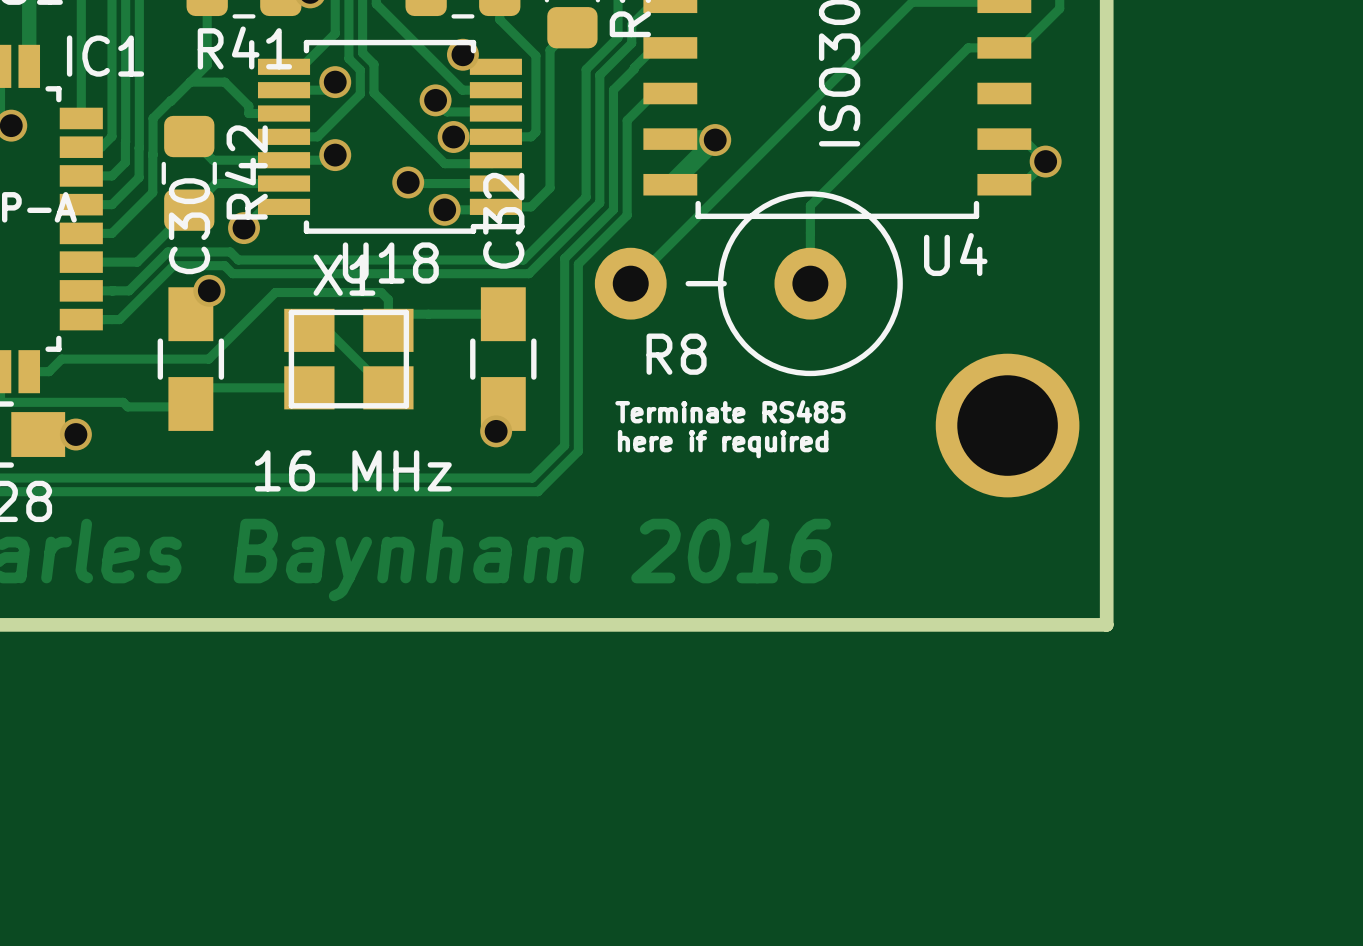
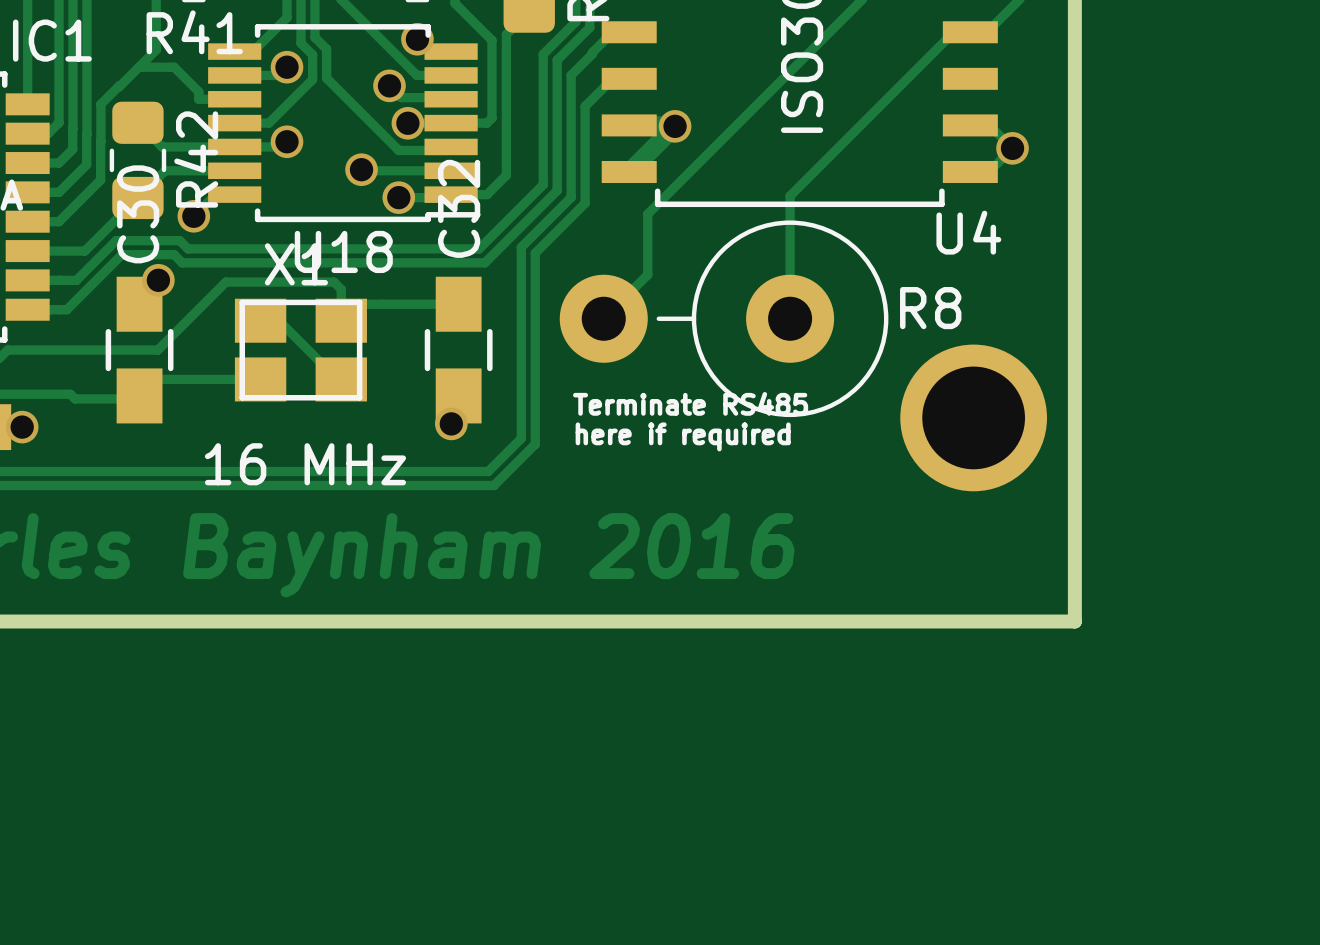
track: (988, 47) (968, 47) (810, 205) (810, 283) -> (953, 32) (790, 195) (790, 318)
R8 footprint: [594, 191, 903, 377] -> [559, 220, 889, 418]
track: (688, 225) (630, 283) -> (647, 214) (647, 274) (603, 318)
U4 name position: U4 (955, 254) -> U4 (968, 232)
R8 name position: R8 (676, 354) -> R8 (930, 308)

